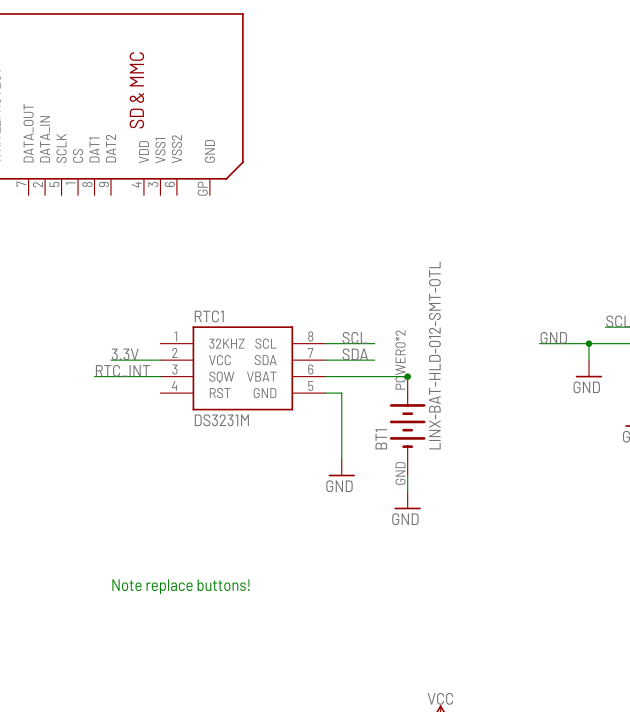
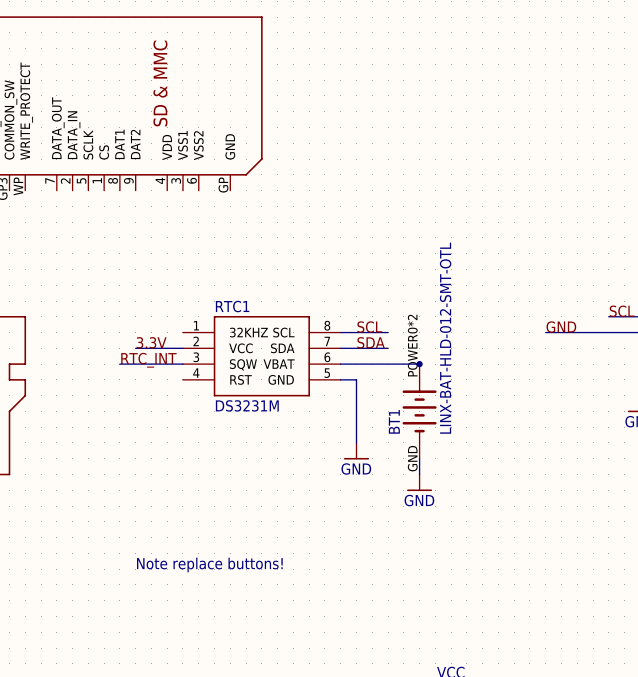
wire: (588, 343) (588, 360) -> none
junction: (588, 343) -> none
power symbol: GND (588, 368) -> none

